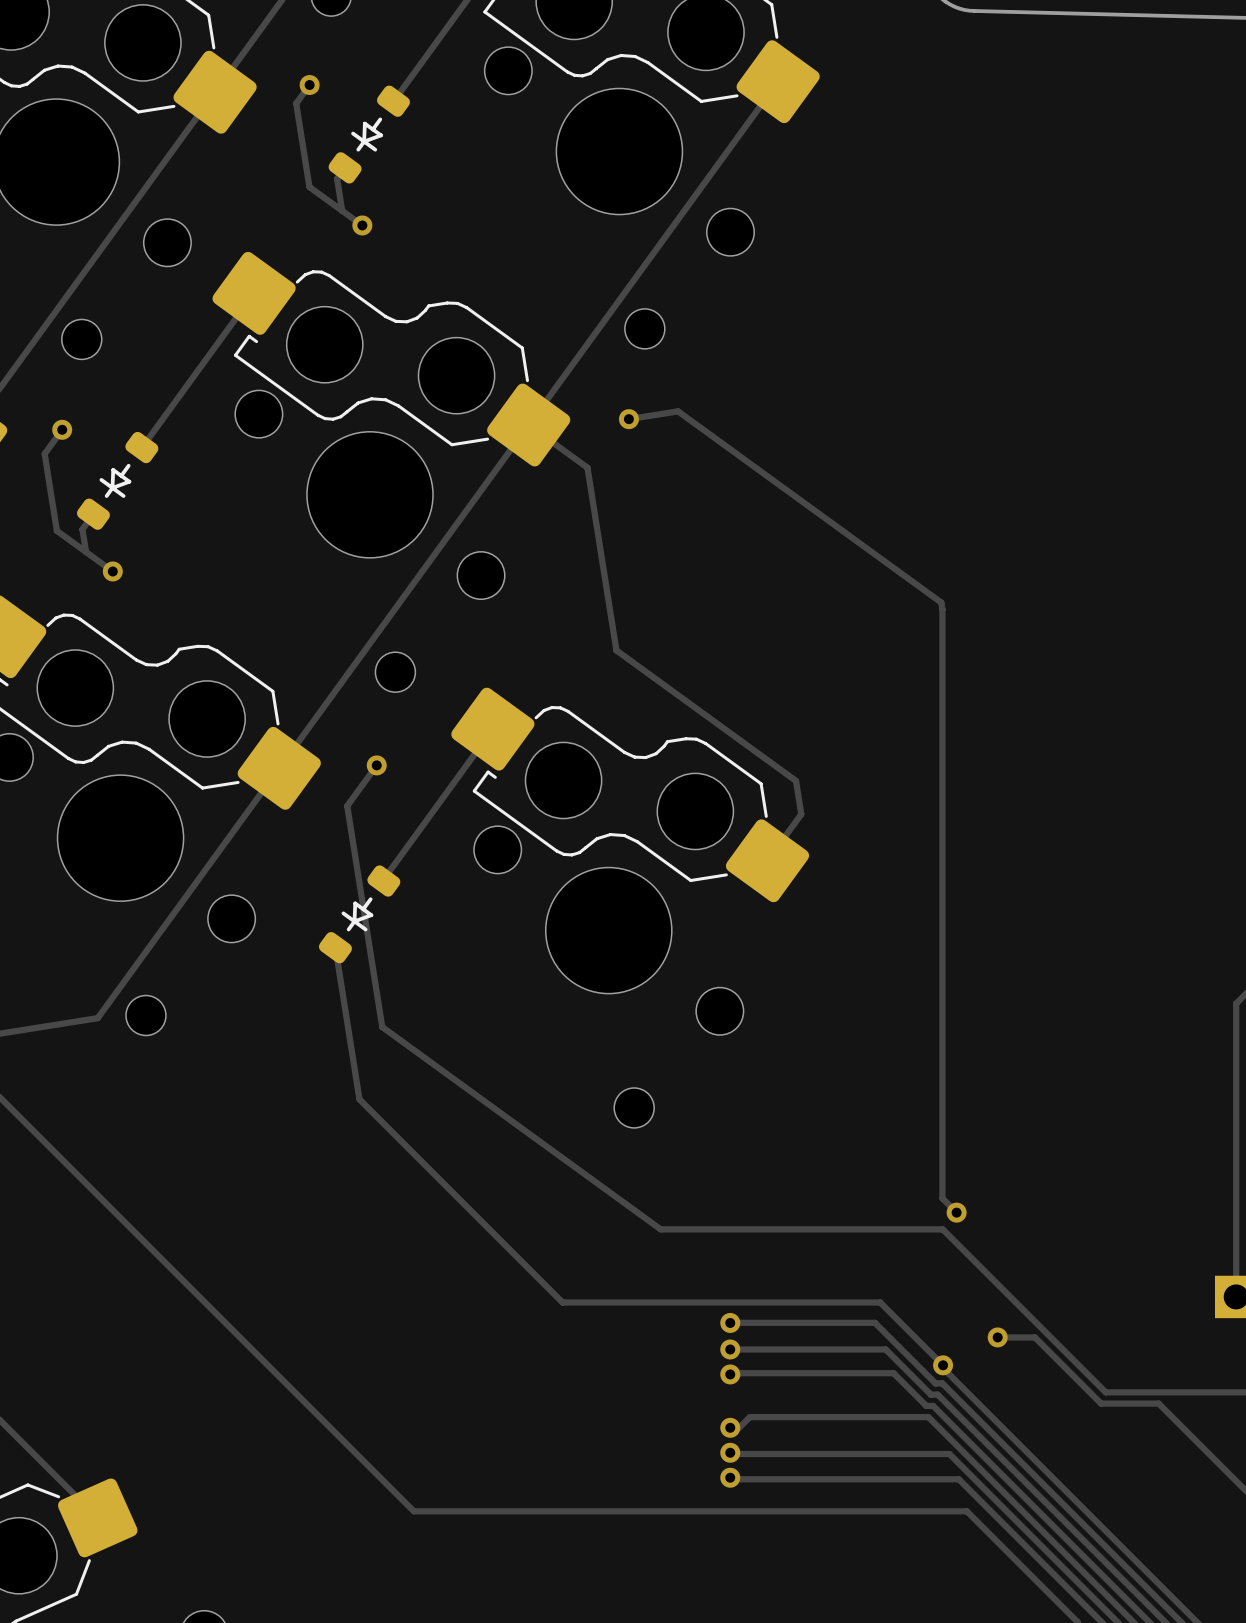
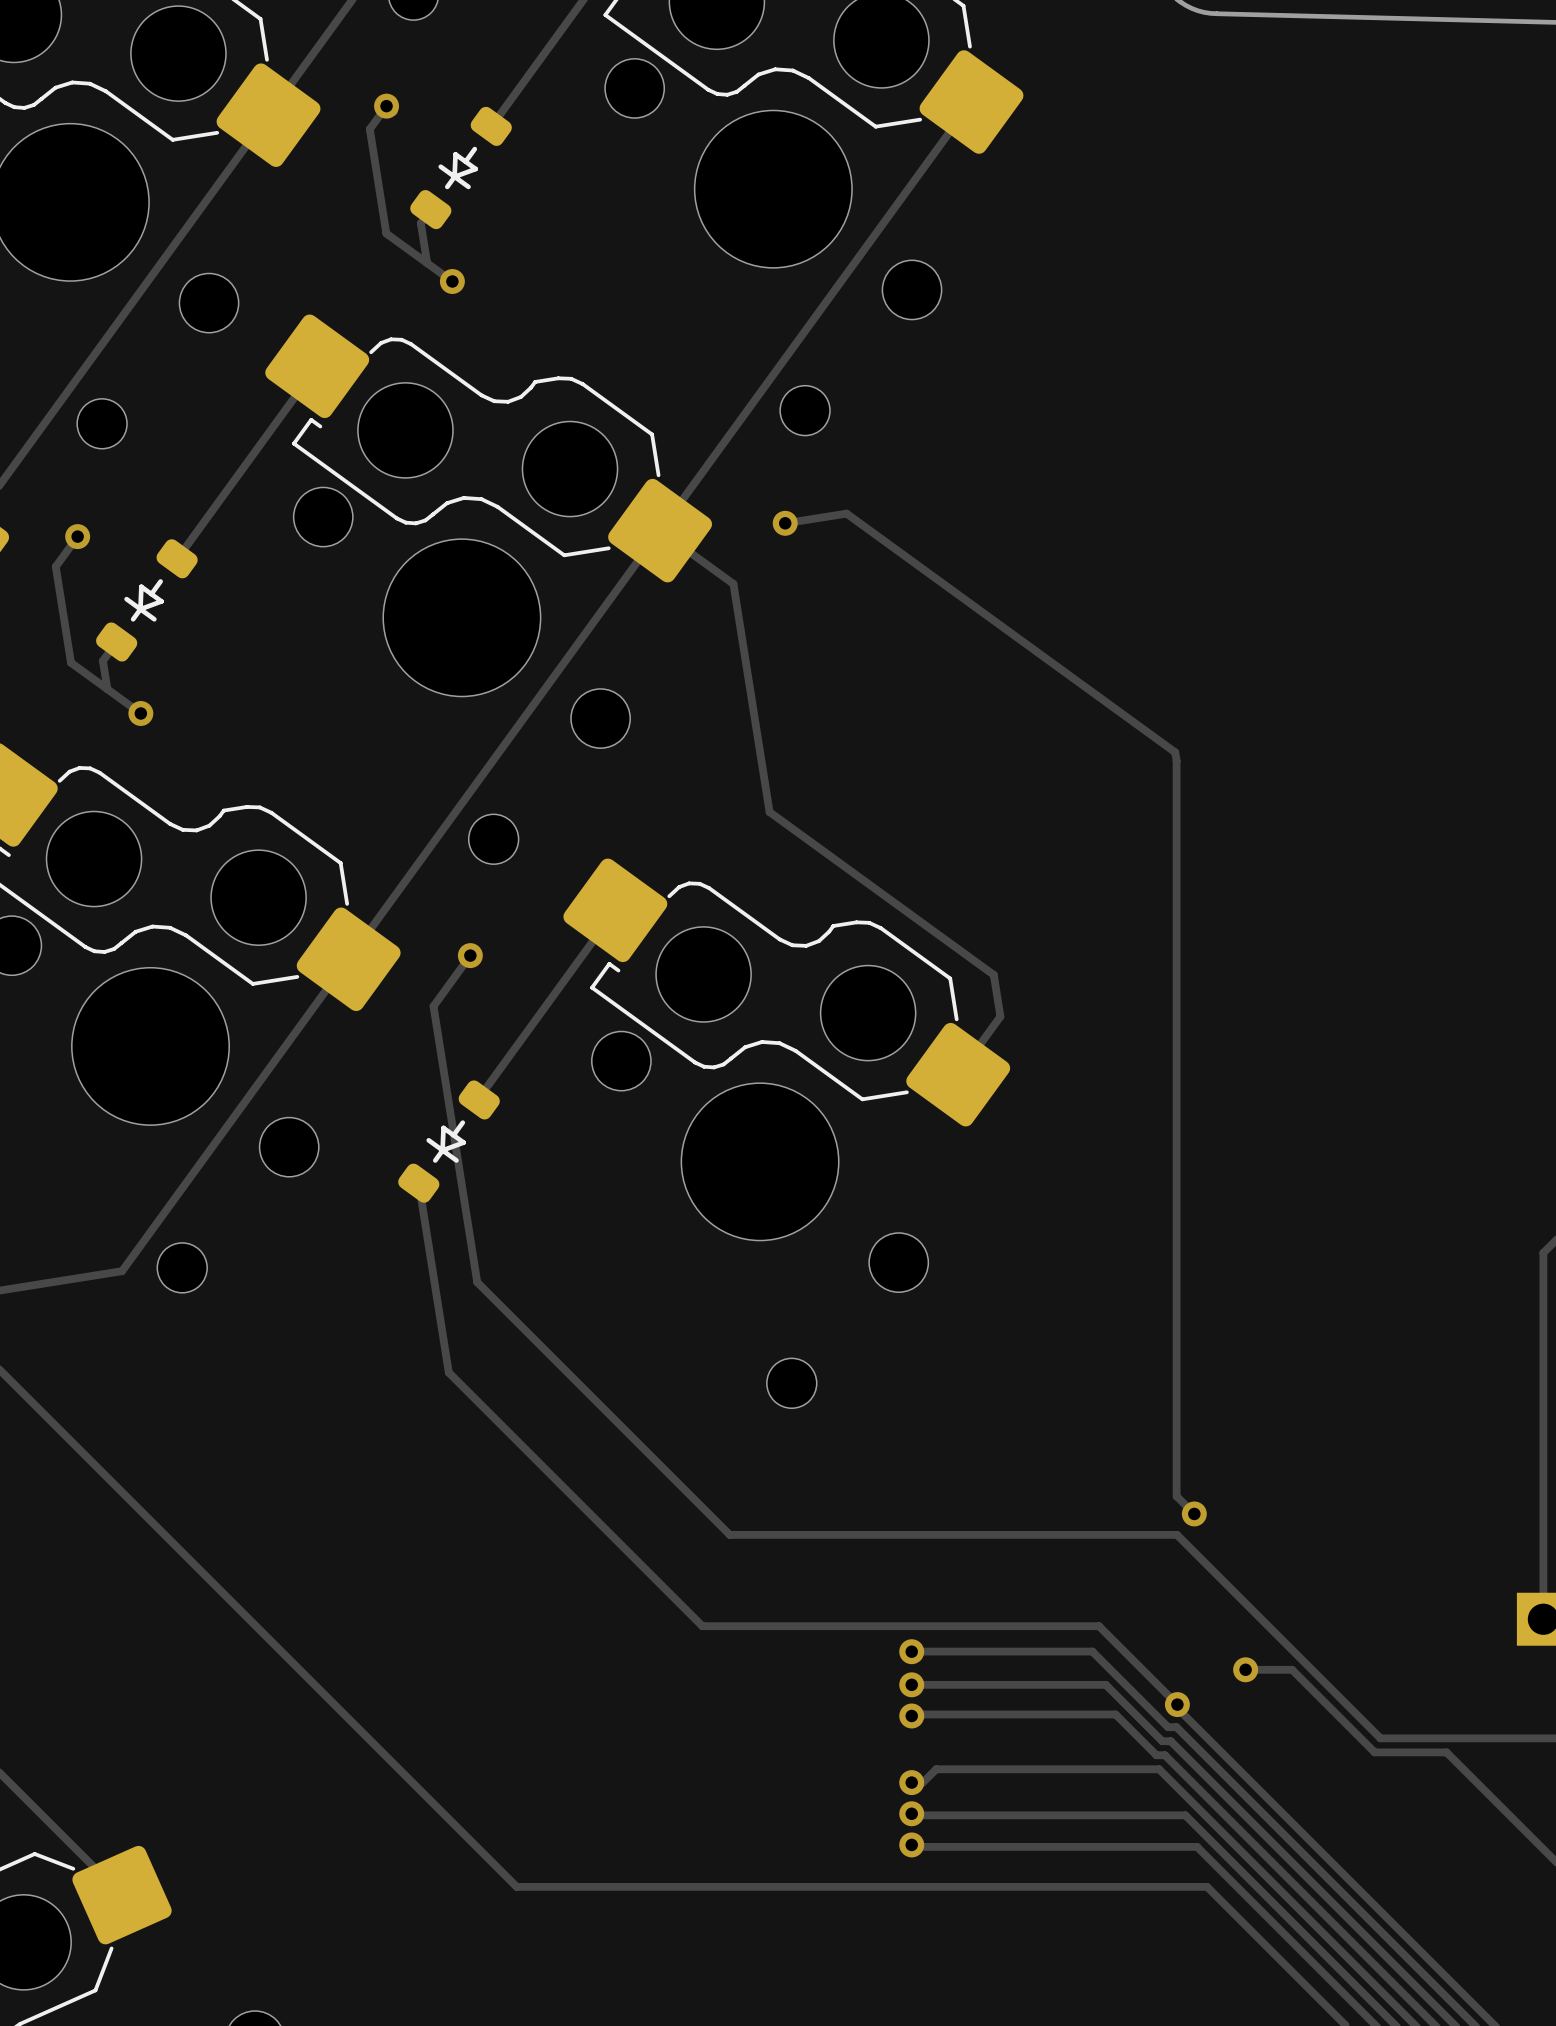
track: (382, 1027) (660, 1229) -> (477, 1282) (729, 1534) (824, 1534)

